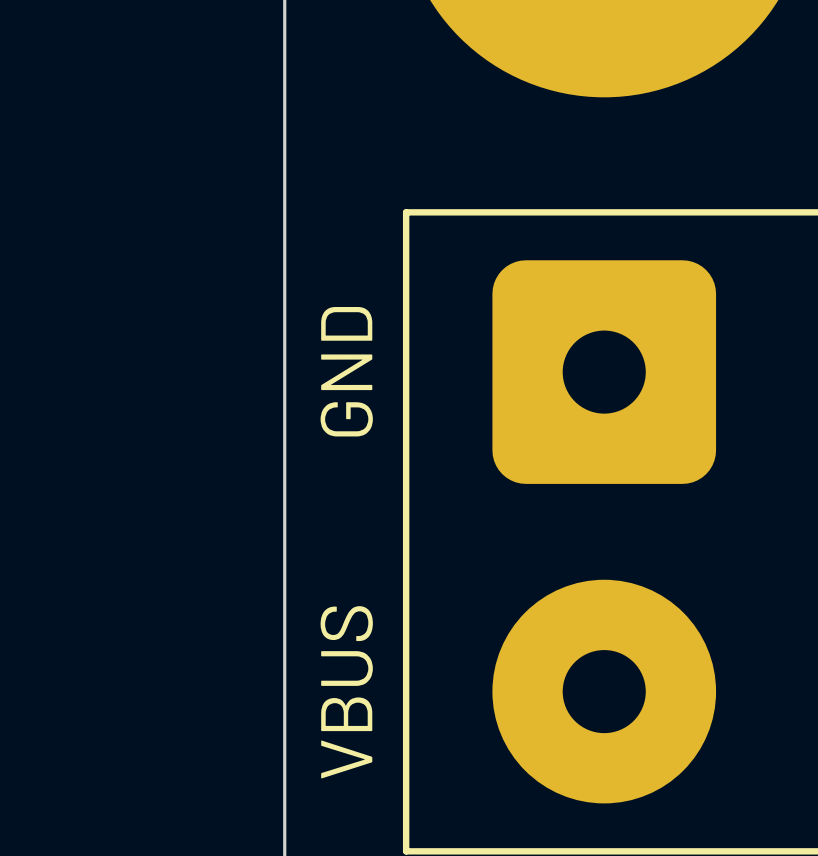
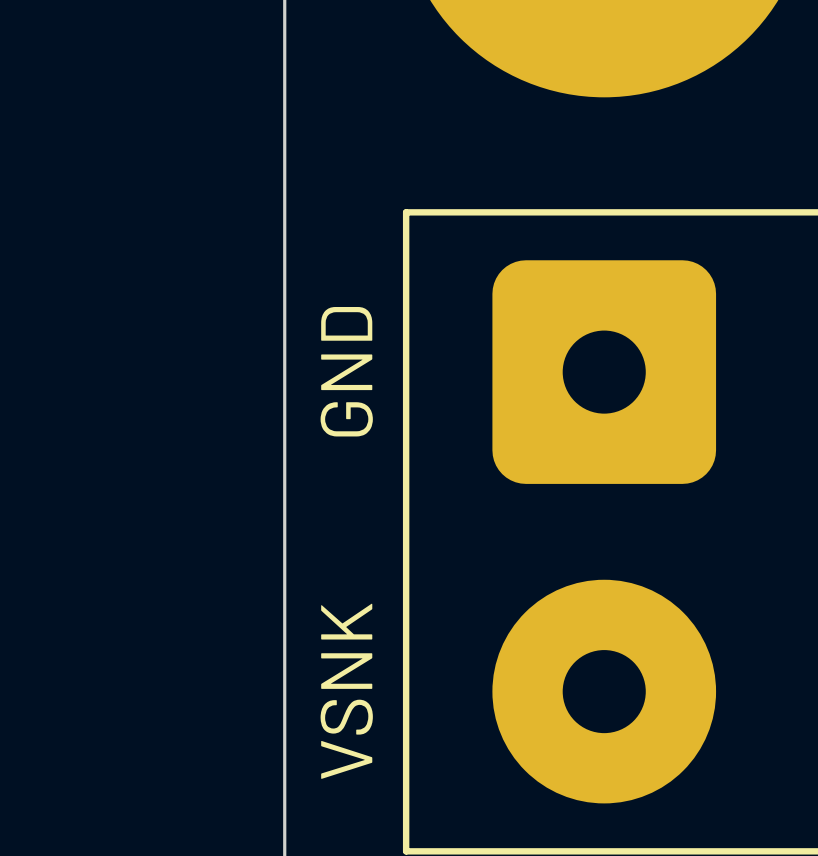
part text: VBUS (346, 692) -> VSNK (346, 691)

